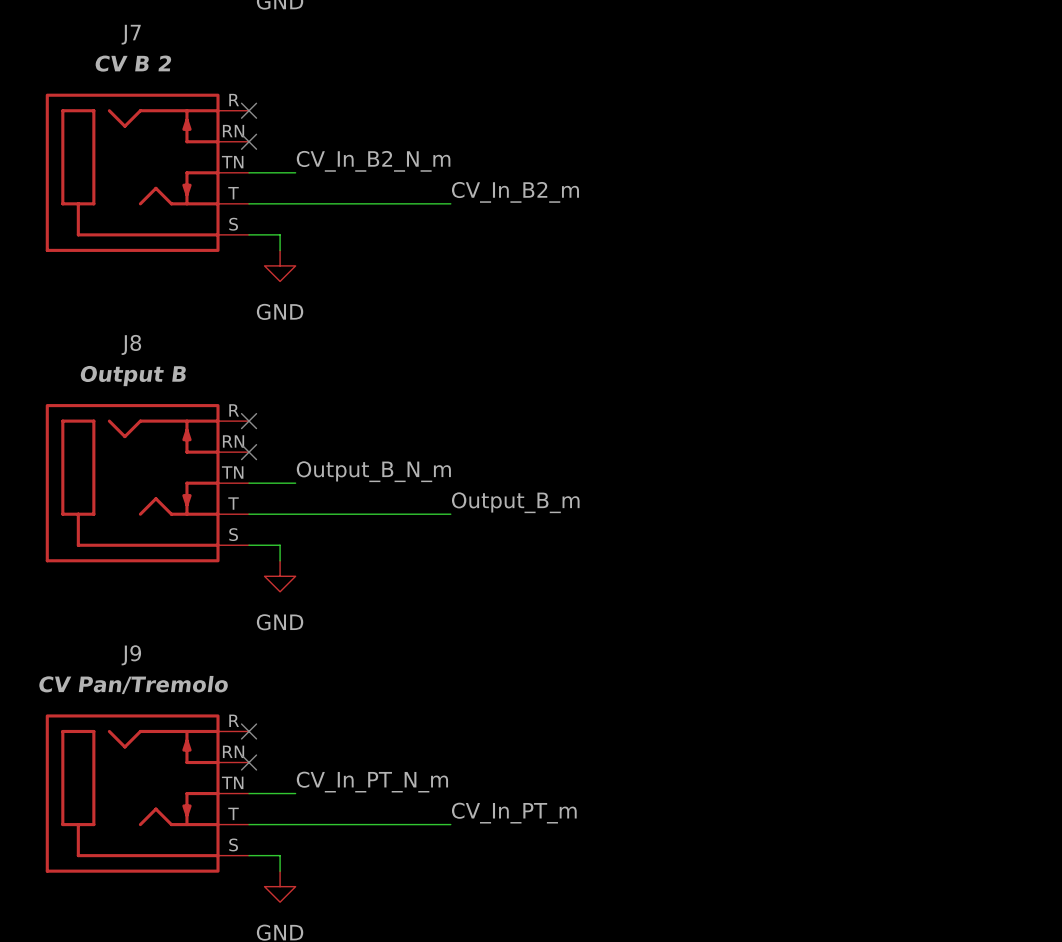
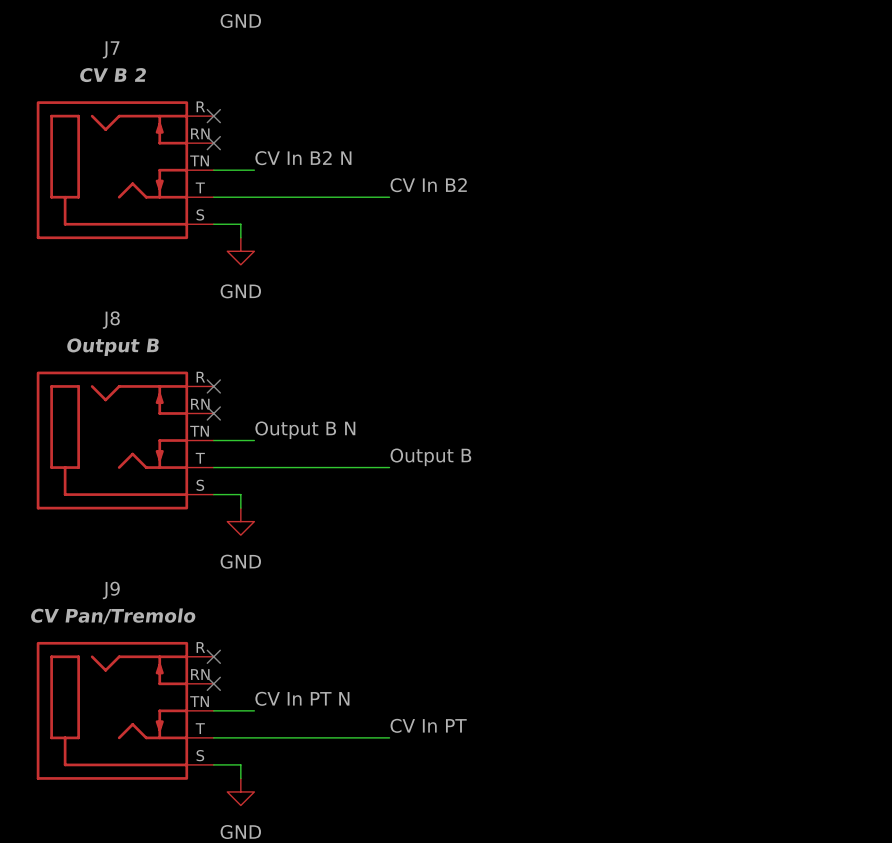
label: CV_In_B2_N_m (373, 161) -> CV In B2 N (303, 158)
label: CV_In_B2_m (515, 192) -> CV In B2 (428, 185)
label: Output_B_N_m (373, 471) -> Output B N (305, 430)
label: Output_B_m (515, 502) -> Output B (430, 457)
label: CV_In_PT_N_m (372, 782) -> CV In PT N (302, 698)
label: CV_In_PT_m (514, 813) -> CV In PT (428, 725)

